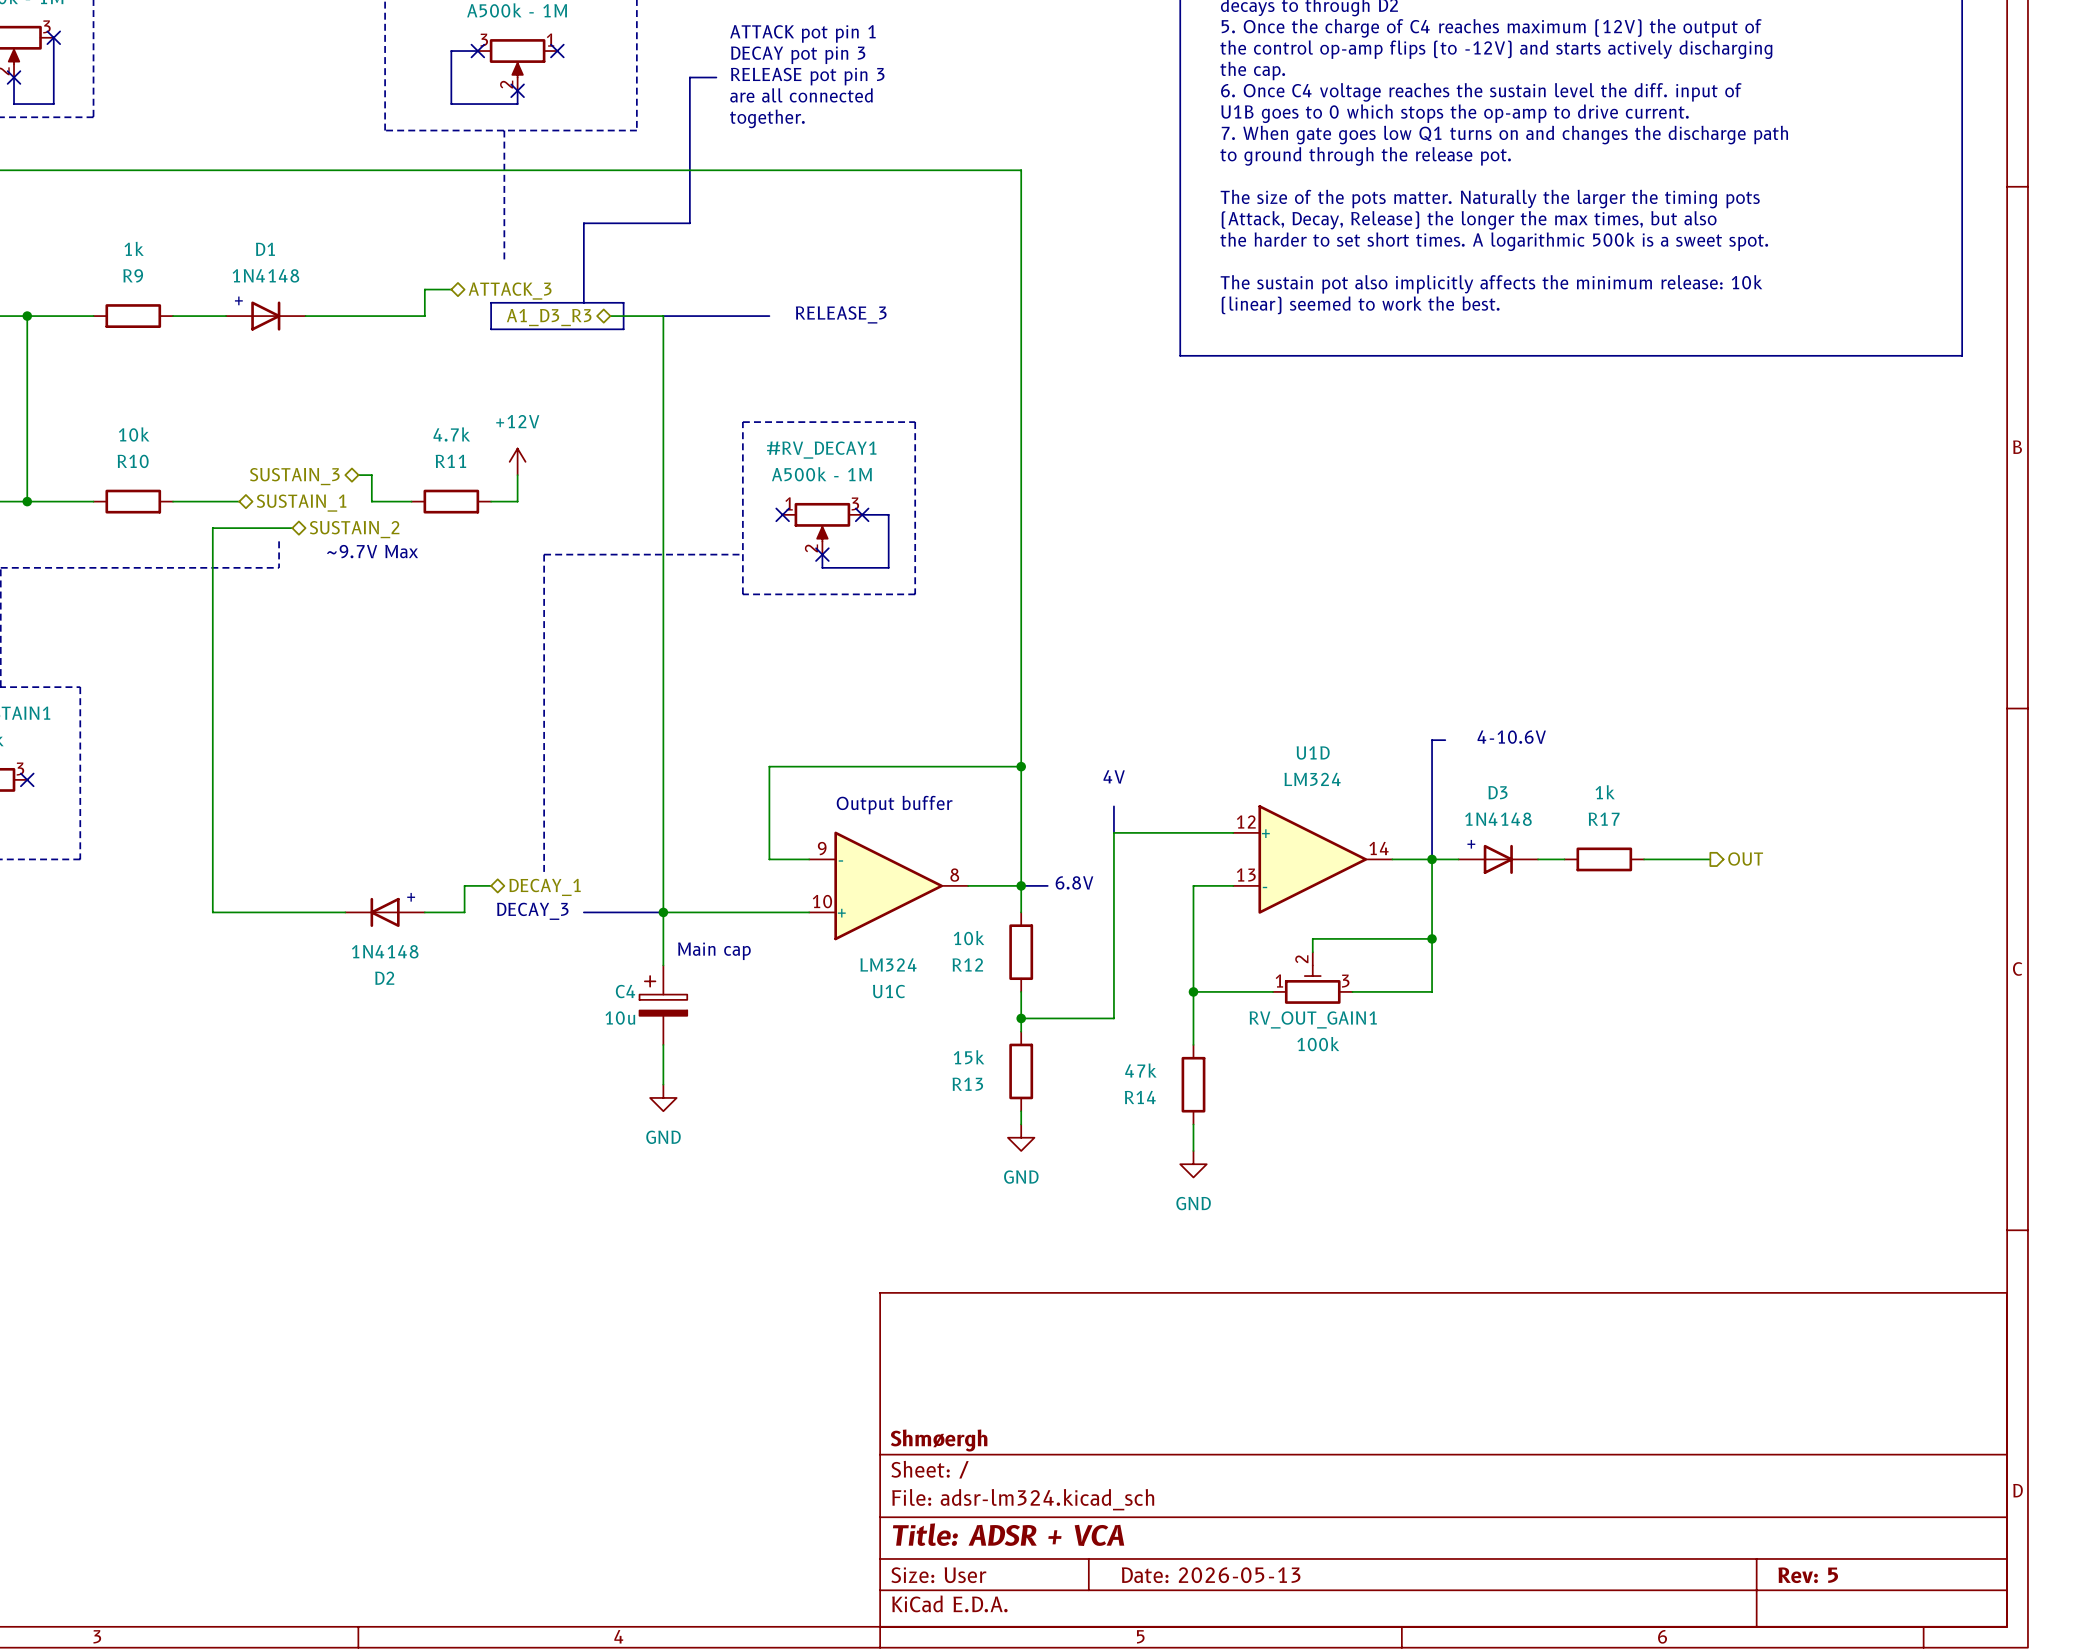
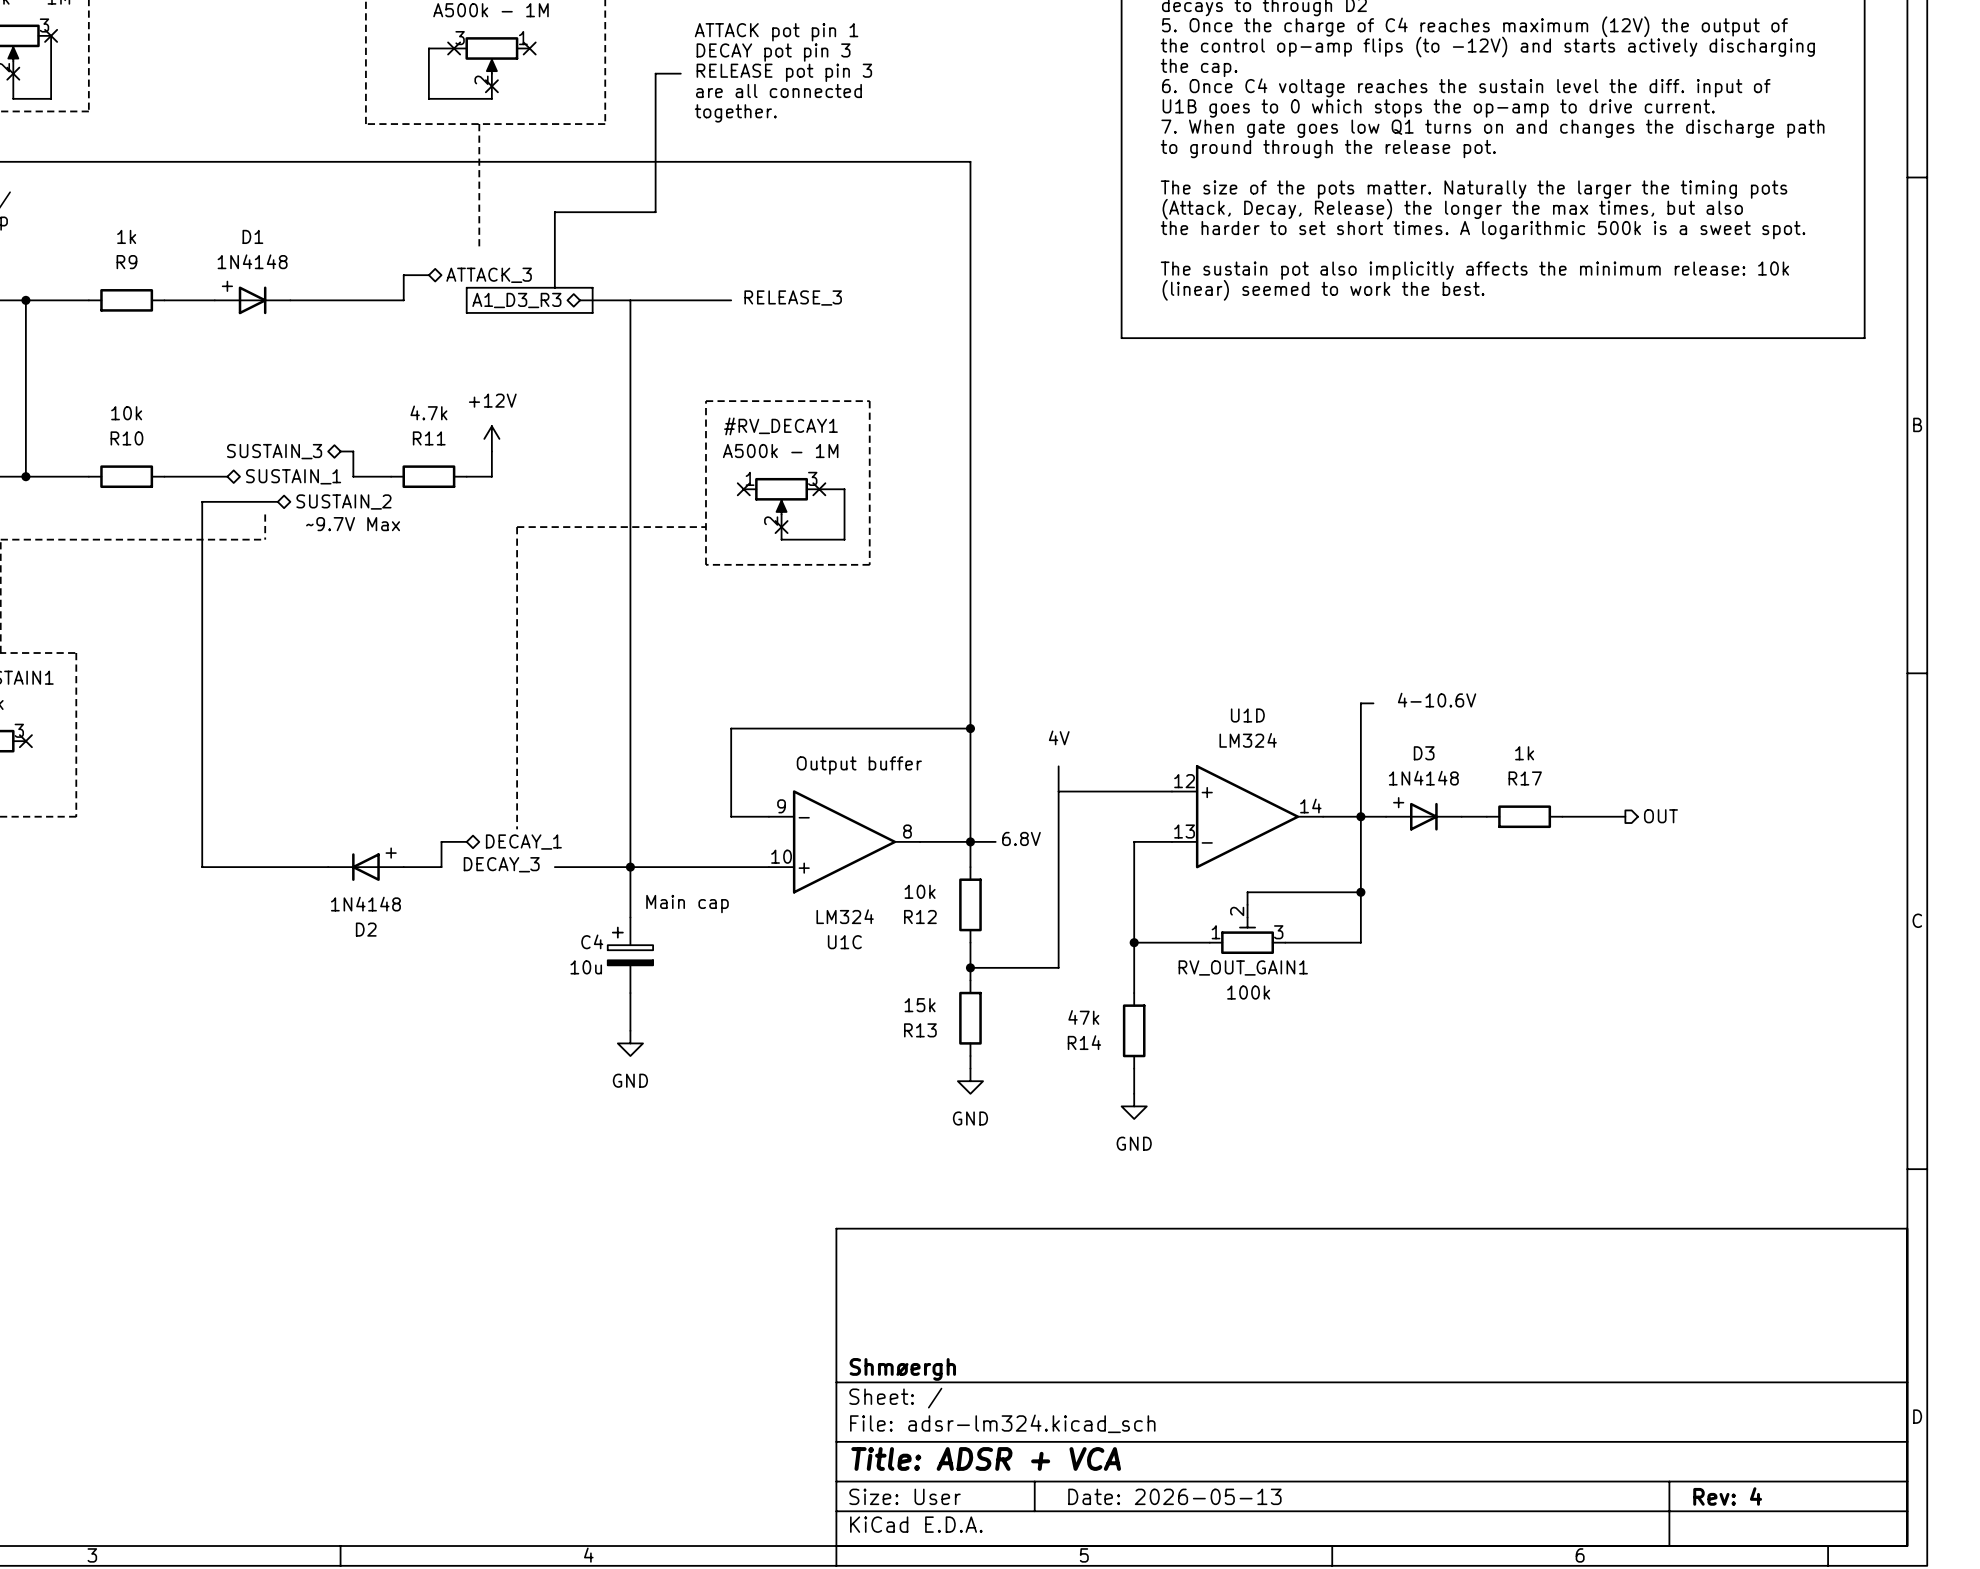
title block: Rev: 5 (1808, 1575) -> Rev: 4 (1727, 1496)

